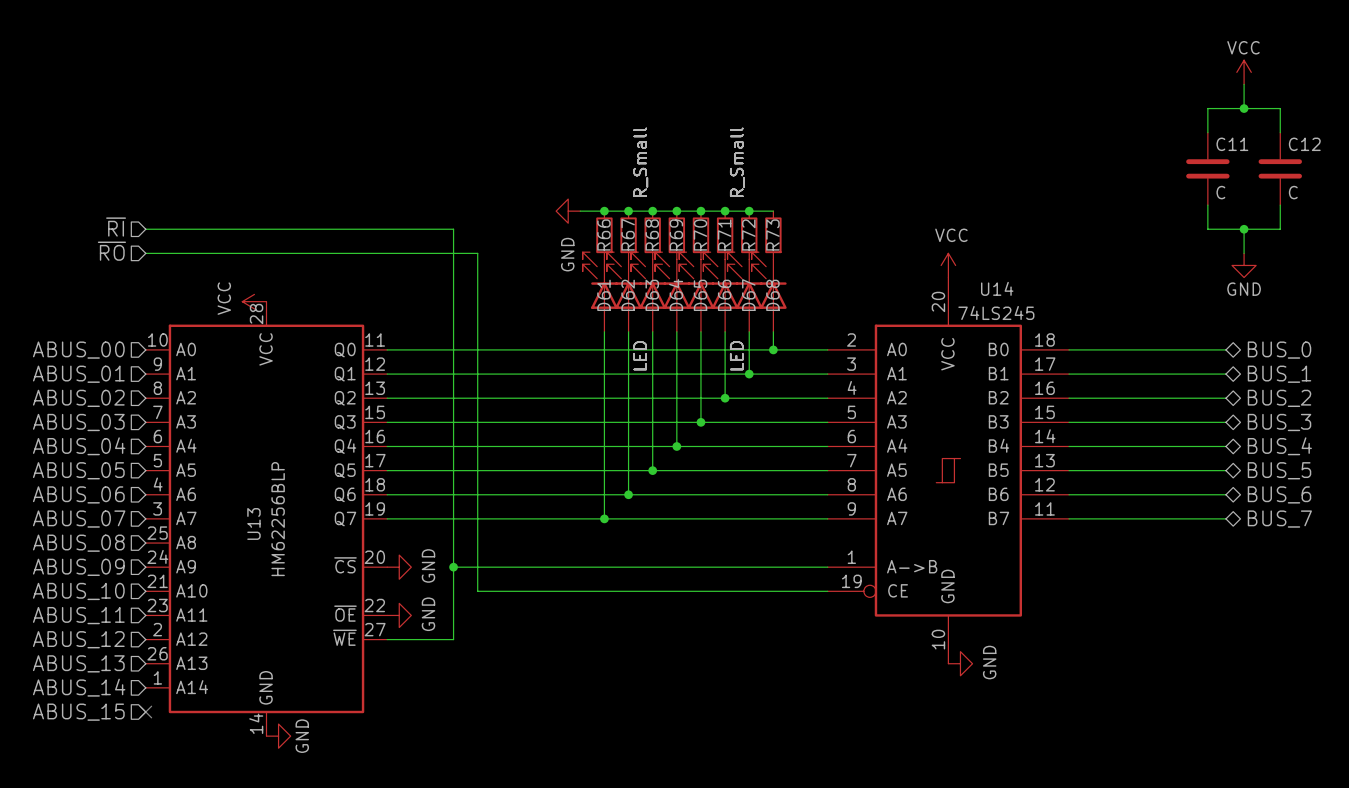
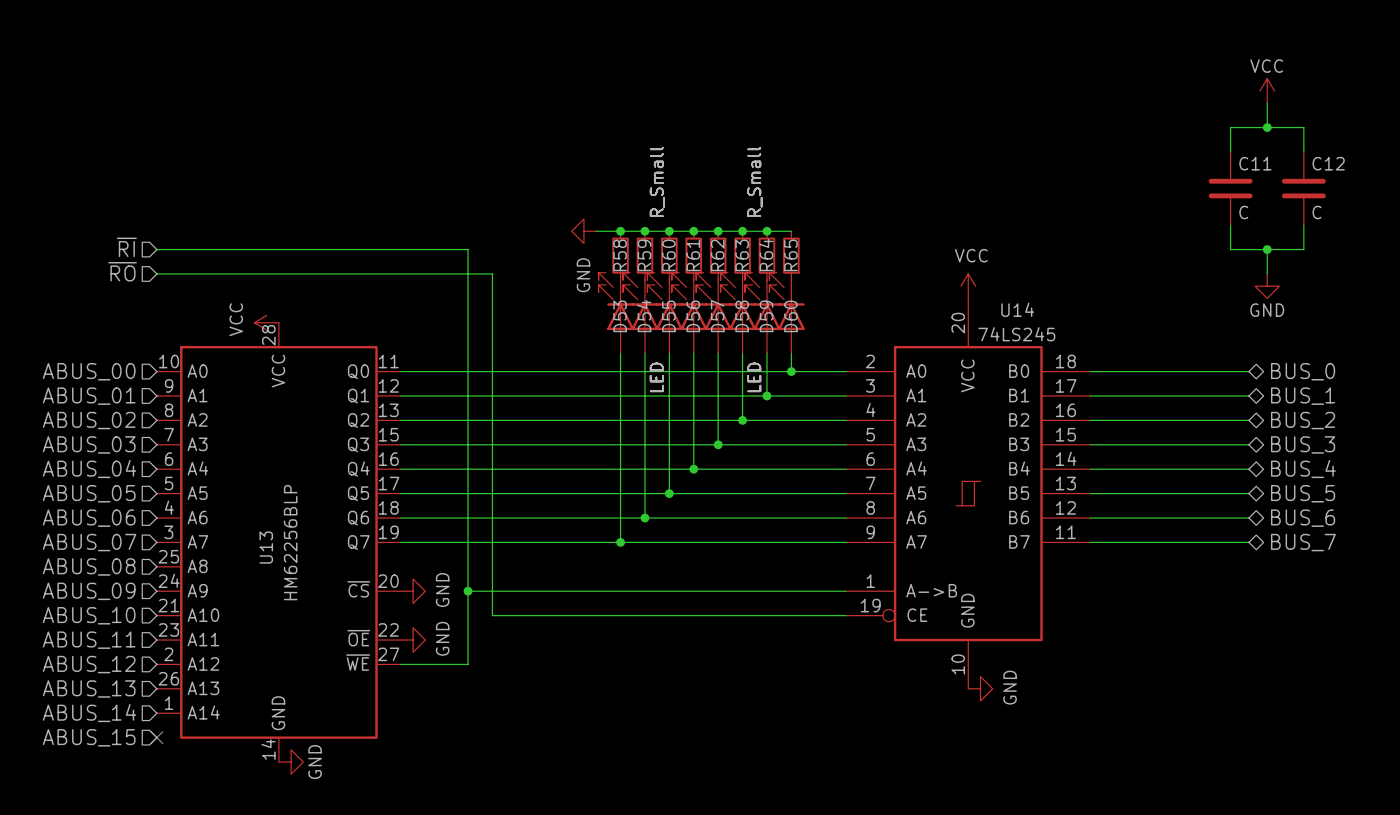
R66 name: R66 (603, 234) -> R58 (620, 255)
R67 name: R67 (628, 234) -> R59 (644, 255)
R68 name: R68 (652, 234) -> R60 (668, 255)
R69 name: R69 (676, 234) -> R61 (693, 255)
R70 name: R70 (700, 234) -> R62 (717, 255)
R71 name: R71 (724, 234) -> R63 (742, 255)
R72 name: R72 (748, 234) -> R64 (766, 255)
R73 name: R73 (772, 234) -> R65 (790, 255)
D61 name: D61 (603, 295) -> D53 (620, 316)
D62 name: D62 (628, 295) -> D54 (644, 316)
D63 name: D63 (652, 295) -> D55 (668, 316)
D64 name: D64 (676, 295) -> D56 (693, 316)
D65 name: D65 (700, 295) -> D57 (717, 316)
D66 name: D66 (724, 295) -> D58 (742, 316)
D67 name: D67 (748, 295) -> D59 (766, 316)
D68 name: D68 (772, 295) -> D60 (790, 316)

